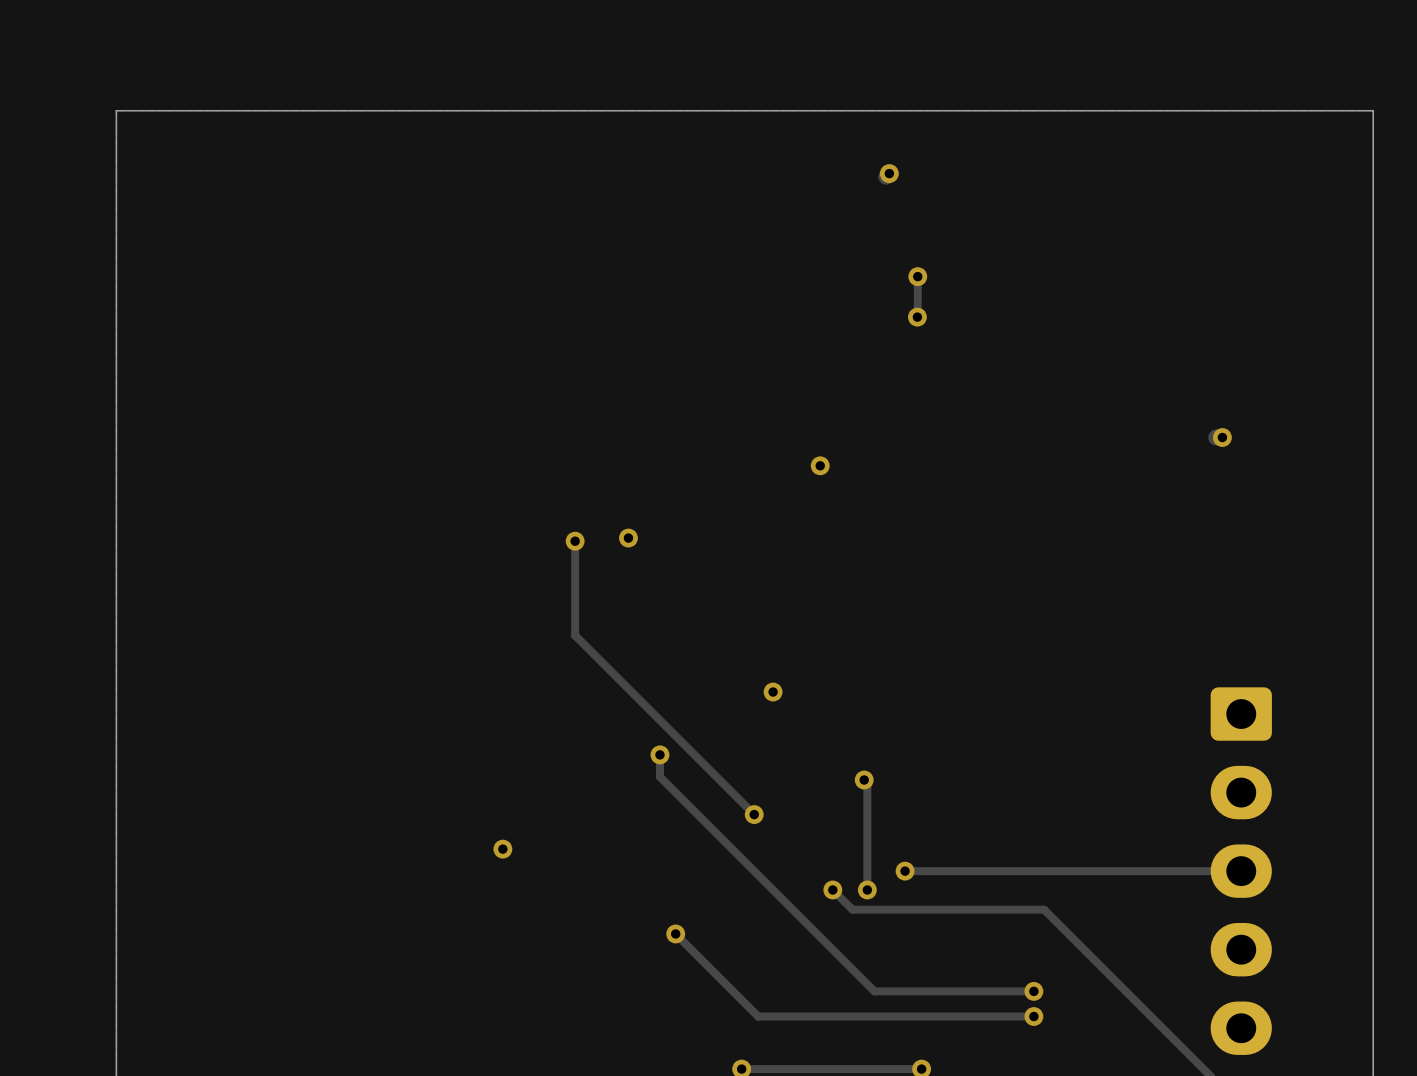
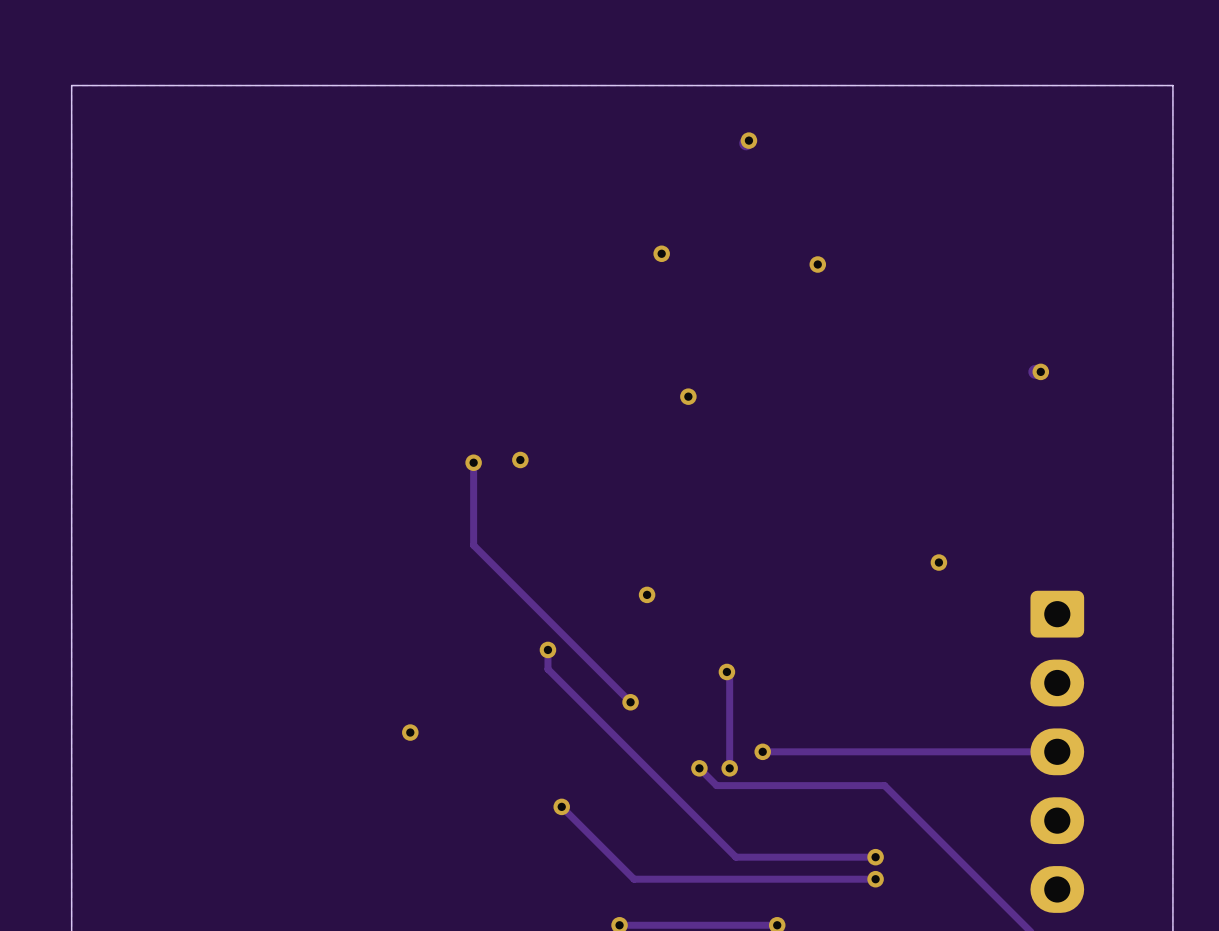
track: (917, 276) (917, 316) -> none
via: (917, 276) -> none
via: none -> (661, 253)
via: none -> (817, 264)
via: (917, 317) -> none
via: none -> (938, 562)

